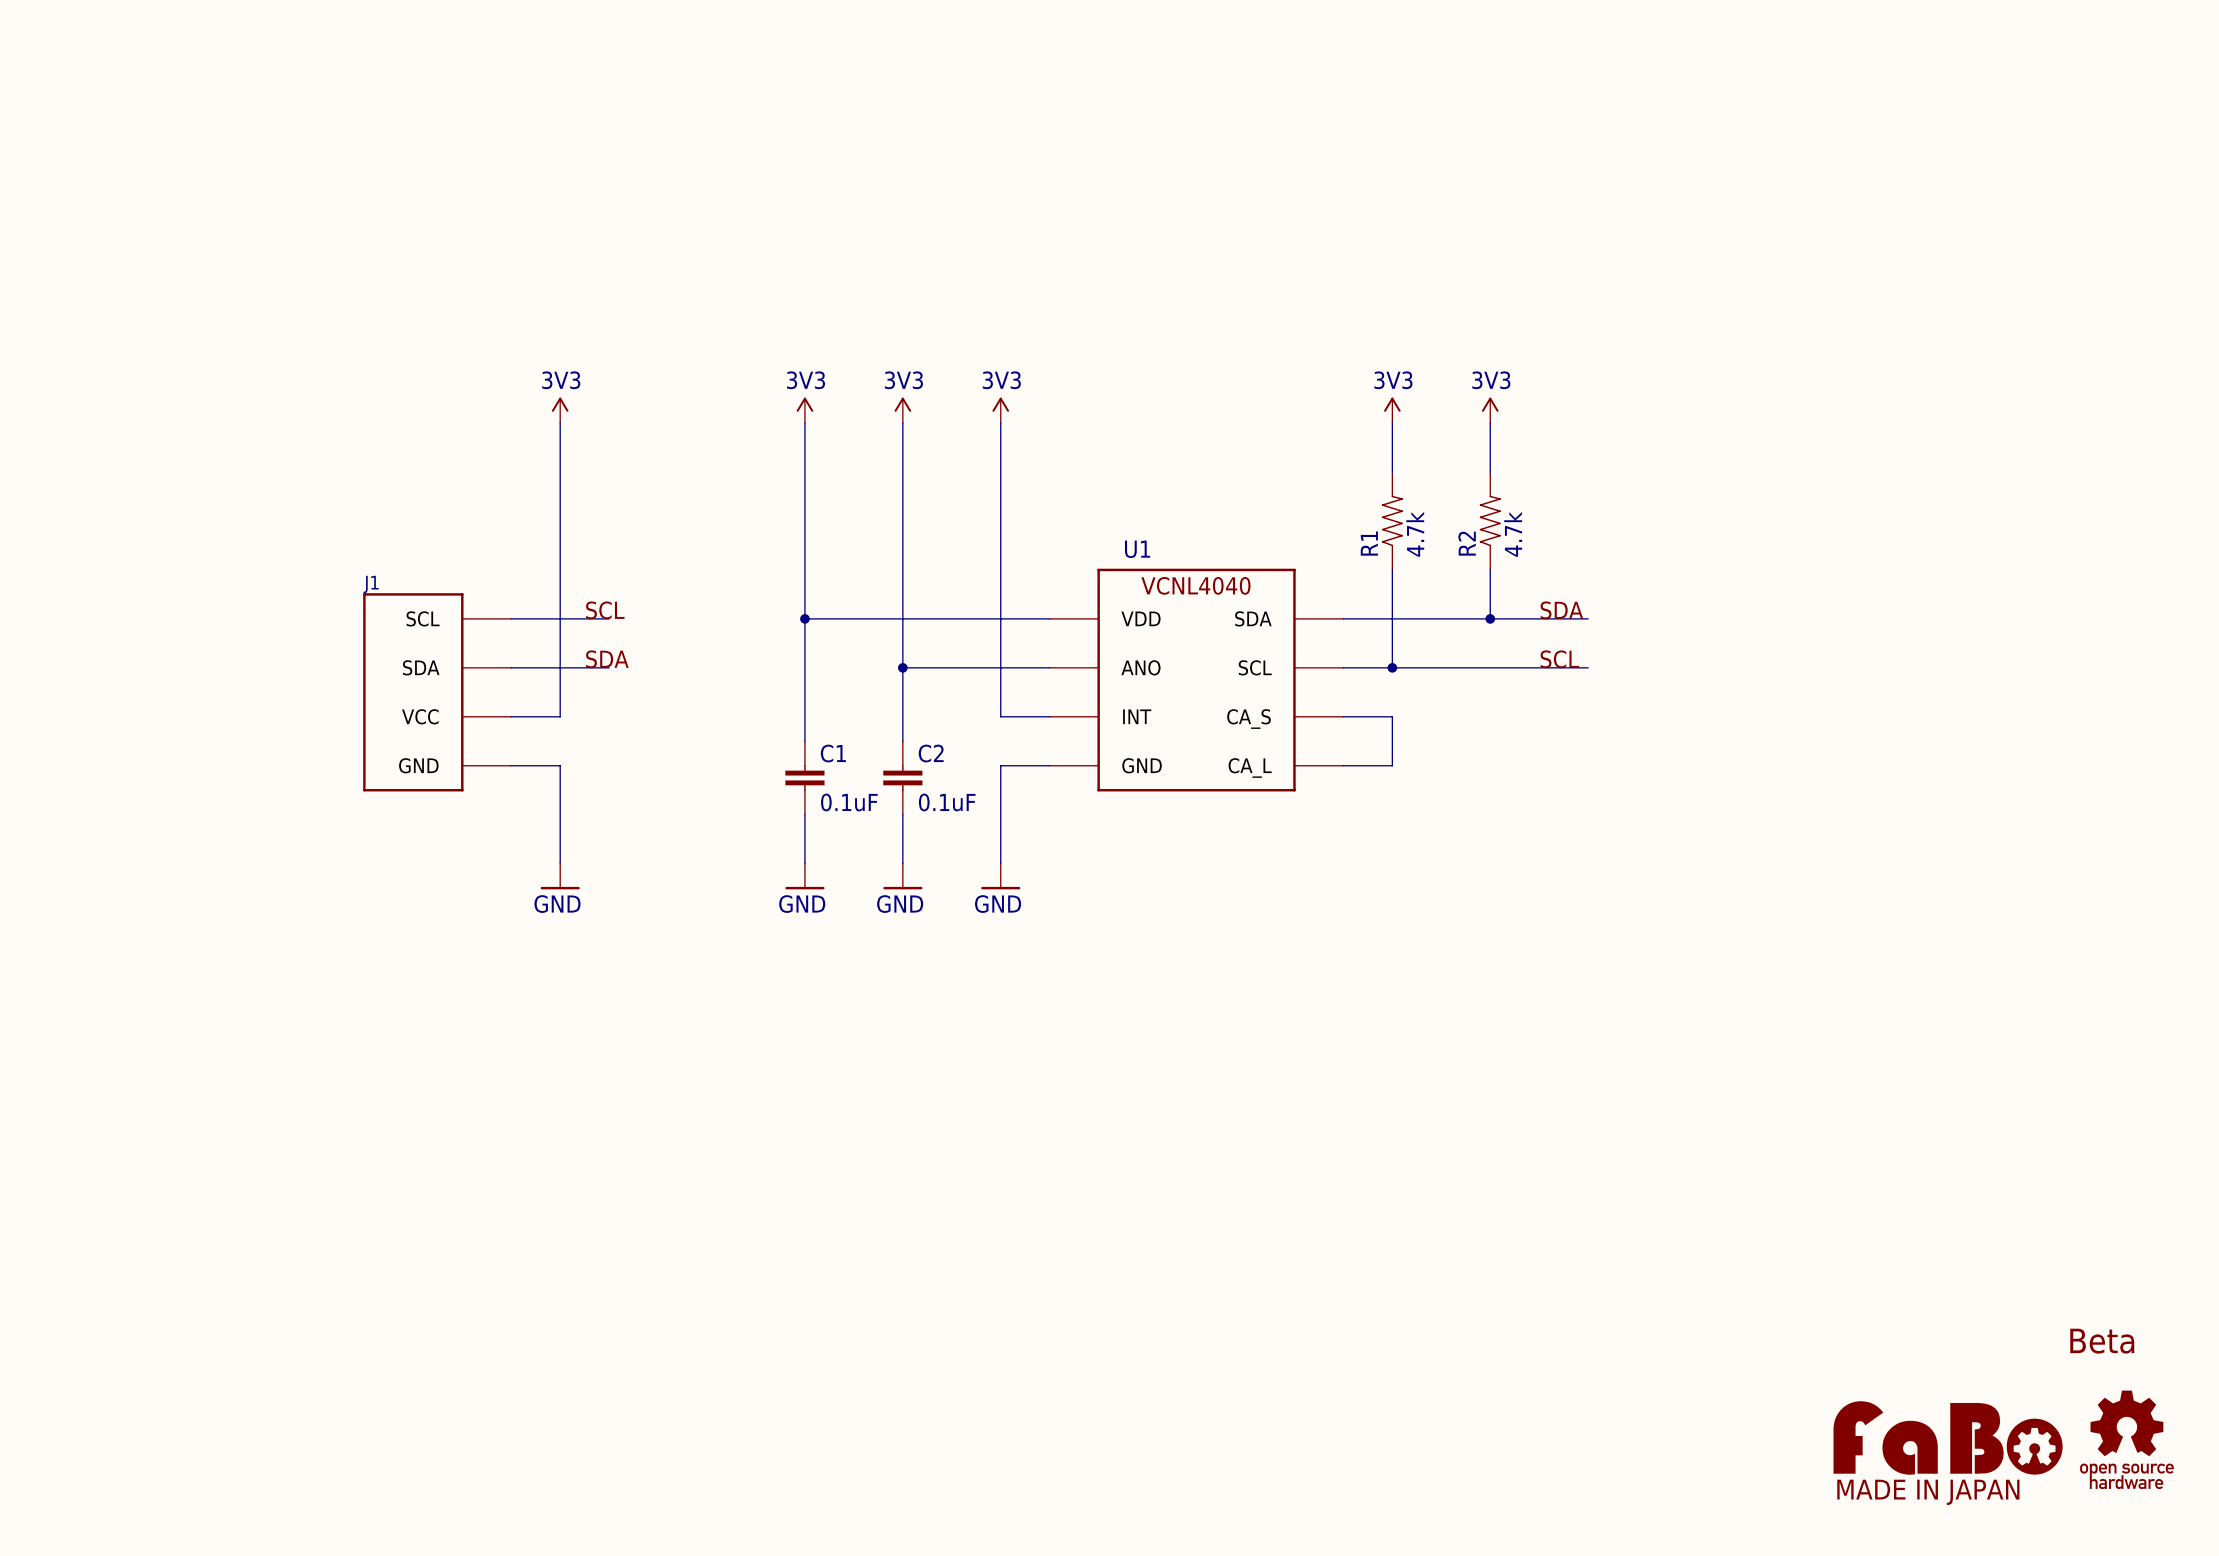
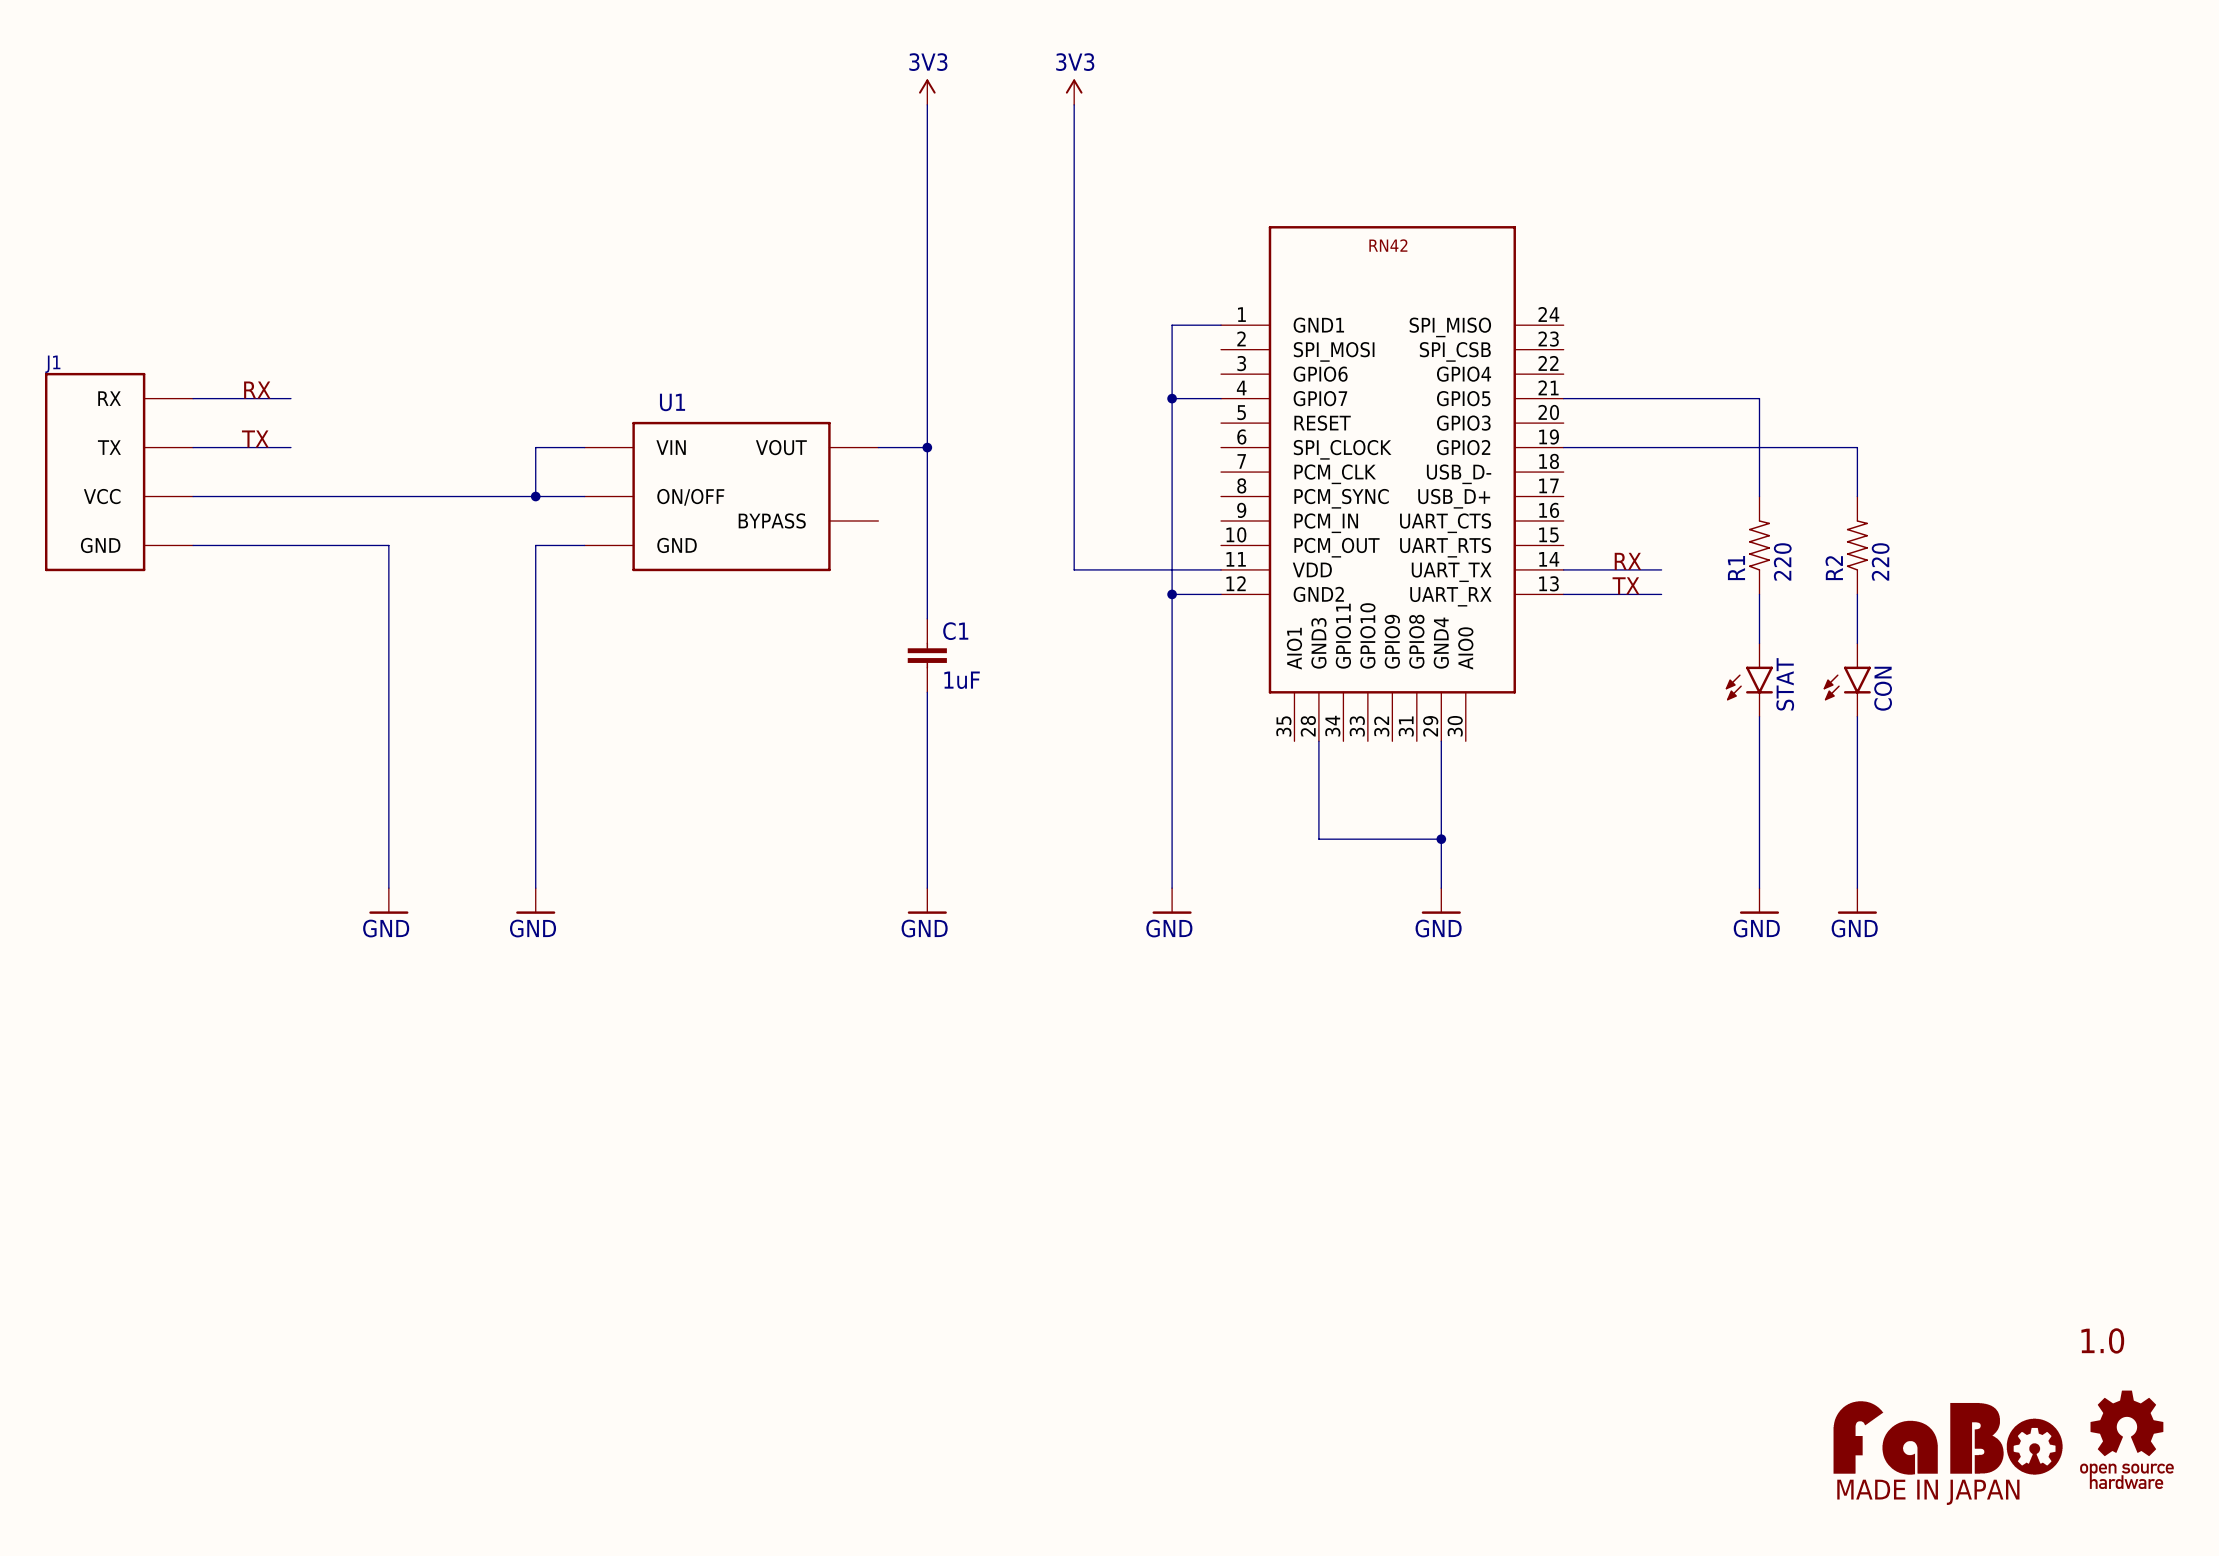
power symbol: none -> 3V3 (927, 92)
power symbol: none -> 3V3 (1074, 92)
wire: none -> (927, 104) (927, 618)
wire: none -> (1074, 104) (1074, 569) (1221, 569)
wire: none -> (1221, 325) (1172, 325) (1172, 888)
label: none -> RX (257, 390)
wire: none -> (193, 398) (290, 398)
wire: none -> (1172, 398) (1221, 398)
junction: none -> (1172, 398)
wire: none -> (1563, 398) (1759, 398) (1759, 496)
power symbol: 3V3 (560, 410) -> none
power symbol: 3V3 (804, 410) -> none
power symbol: 3V3 (902, 410) -> none
power symbol: 3V3 (1000, 410) -> none
power symbol: 3V3 (1392, 410) -> none
power symbol: 3V3 (1490, 410) -> none
wire: (560, 423) (560, 716) (511, 716) -> none
wire: (804, 423) (804, 741) -> none
wire: (902, 423) (902, 741) -> none
wire: (1000, 423) (1000, 716) (1049, 716) -> none
wire: (1392, 423) (1392, 472) -> none
wire: (1490, 423) (1490, 472) -> none
label: none -> TX (255, 439)
wire: none -> (193, 447) (290, 447)
wire: none -> (584, 447) (535, 447) (535, 496)
wire: none -> (878, 447) (927, 447)
junction: none -> (927, 447)
wire: none -> (1563, 447) (1857, 447) (1857, 496)
part: none -> (1392, 483)
wire: none -> (193, 496) (584, 496)
junction: none -> (535, 496)
R1 position: (1392, 520) -> (1759, 545)
R2 position: (1490, 520) -> (1857, 545)
R1 value: 4.7k (1415, 534) -> 220 (1782, 561)
R2 value: 4.7k (1513, 534) -> 220 (1880, 561)
wire: none -> (193, 545) (388, 545) (388, 888)
wire: none -> (584, 545) (535, 545) (535, 888)
U1 name position: U1 (1137, 549) -> U1 (672, 402)
label: none -> RX (1627, 561)
U1 symbol: [1049, 568, 1344, 792] -> [584, 421, 879, 572]
wire: (1392, 569) (1392, 667) -> none
wire: (1490, 569) (1490, 618) -> none
wire: none -> (1563, 569) (1661, 569)
label: none -> TX (1625, 585)
wire: none -> (1172, 594) (1221, 594)
junction: none -> (1172, 594)
wire: none -> (1563, 594) (1661, 594)
wire: none -> (1759, 594) (1759, 643)
wire: none -> (1857, 594) (1857, 643)
label: SCL (605, 610) -> none
label: SDA (1561, 610) -> none
J1 pin name: SCL (423, 618) -> RX (109, 398)
wire: (511, 618) (609, 618) -> none
wire: (804, 618) (1049, 618) -> none
junction: (804, 618) -> none
wire: (1343, 618) (1588, 618) -> none
junction: (1490, 618) -> none
label: SDA (607, 659) -> none
label: SCL (1559, 659) -> none
J1 pin name: SDA (421, 667) -> TX (109, 447)
wire: (511, 667) (609, 667) -> none
wire: (902, 667) (1049, 667) -> none
junction: (902, 667) -> none
wire: (1343, 667) (1588, 667) -> none
junction: (1392, 667) -> none
STAT: none -> (1749, 680)
CON: none -> (1847, 680)
J1 position: (437, 692) -> (119, 472)
wire: none -> (927, 692) (927, 888)
wire: (1343, 716) (1392, 716) (1392, 765) (1343, 765) -> none
wire: none -> (1759, 716) (1759, 888)
wire: none -> (1857, 716) (1857, 888)
wire: none -> (1318, 741) (1318, 839) (1441, 839)
wire: none -> (1441, 741) (1441, 888)
wire: (511, 765) (560, 765) (560, 863) -> none
wire: (1049, 765) (1000, 765) (1000, 863) -> none
C1 position: (804, 777) -> (927, 655)
C2: 0.1uF (902, 777) -> none
C1 value: 0.1uF (849, 802) -> 1uF (962, 680)
wire: (804, 814) (804, 863) -> none
wire: (902, 814) (902, 863) -> none
junction: none -> (1441, 839)
power symbol position: GND (560, 876) -> GND (535, 900)
power symbol: GND (804, 876) -> none
power symbol position: GND (902, 876) -> GND (927, 900)
power symbol: GND (1000, 876) -> none
power symbol: none -> GND (388, 900)
power symbol: none -> GND (1172, 900)
power symbol: none -> GND (1441, 900)
power symbol: none -> GND (1759, 900)
power symbol: none -> GND (1857, 900)
text: Beta (2102, 1341) -> 1.0 (2102, 1340)

